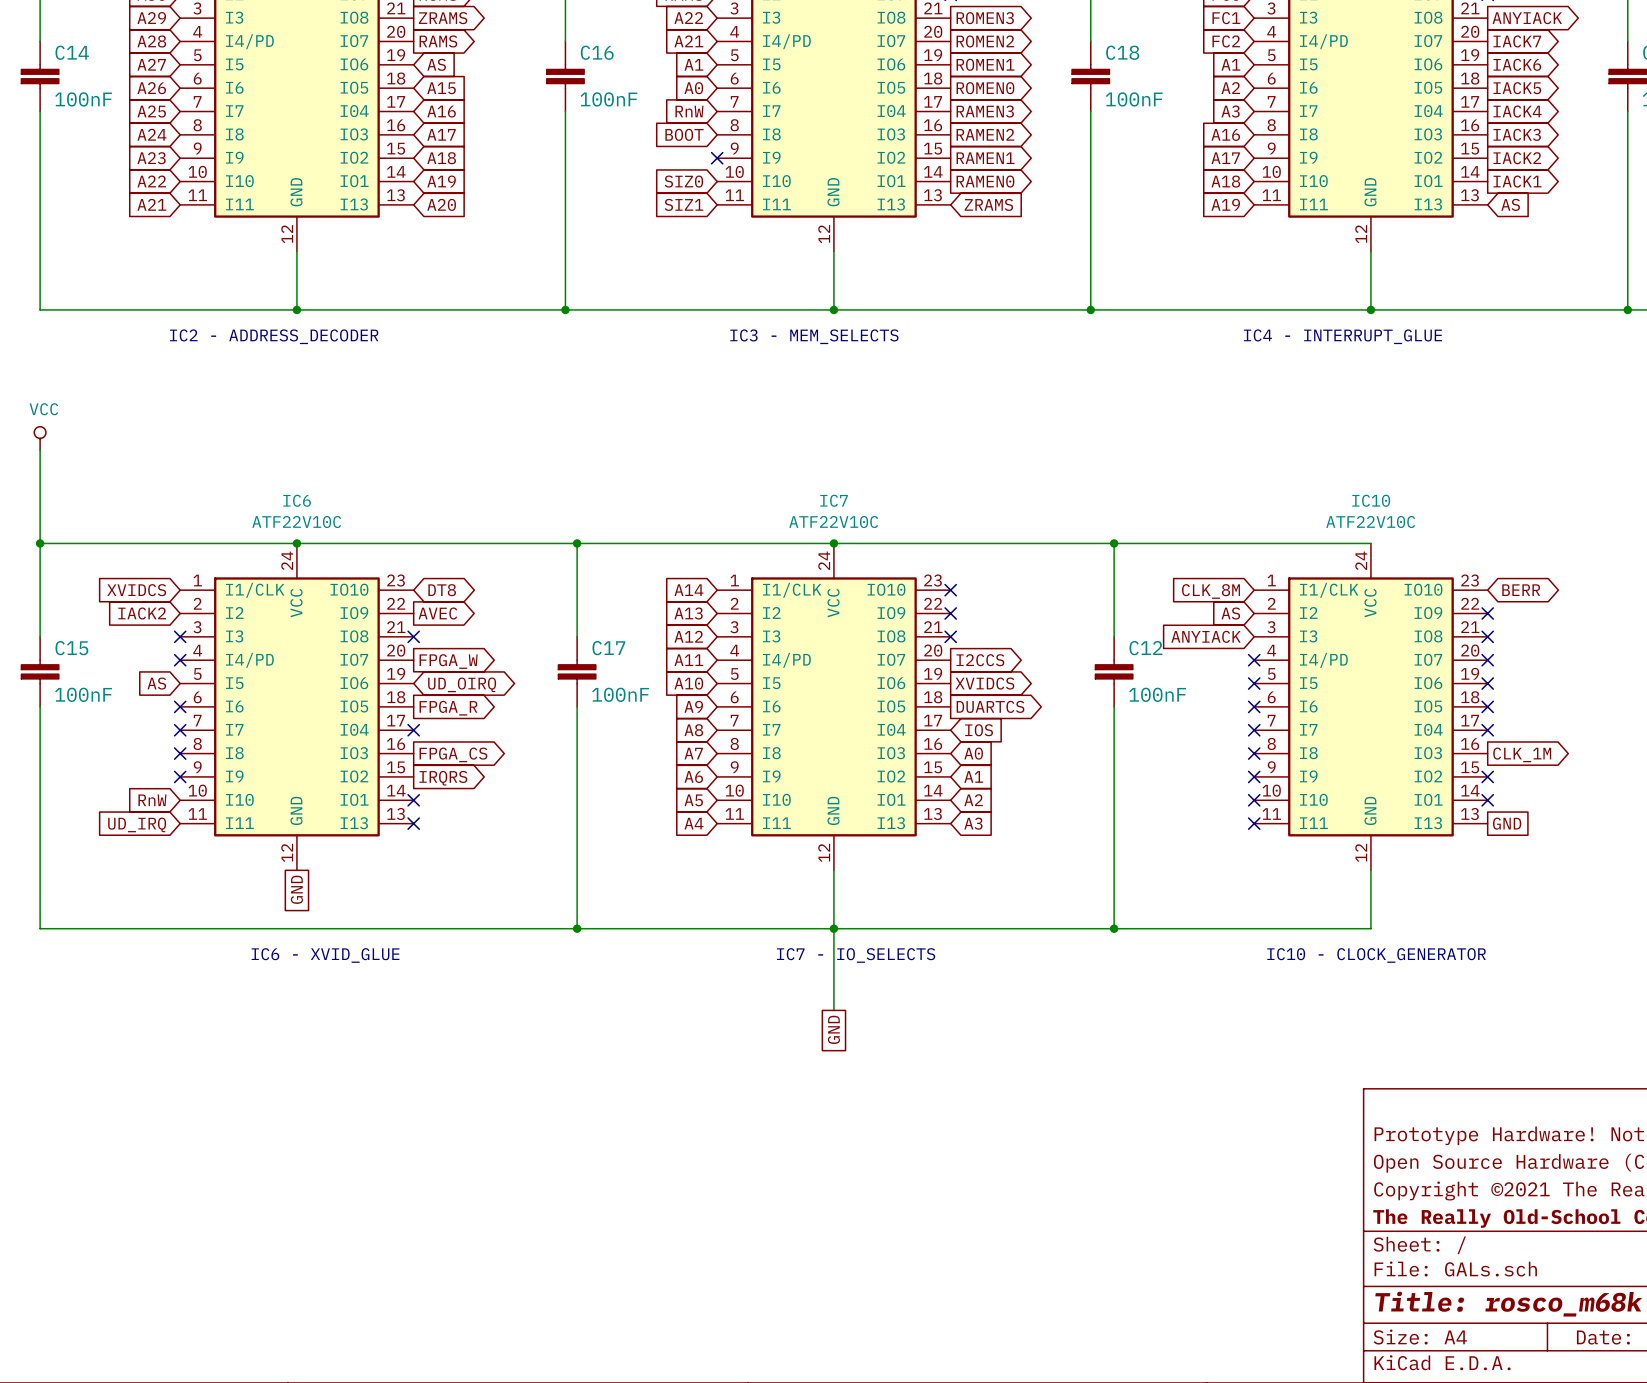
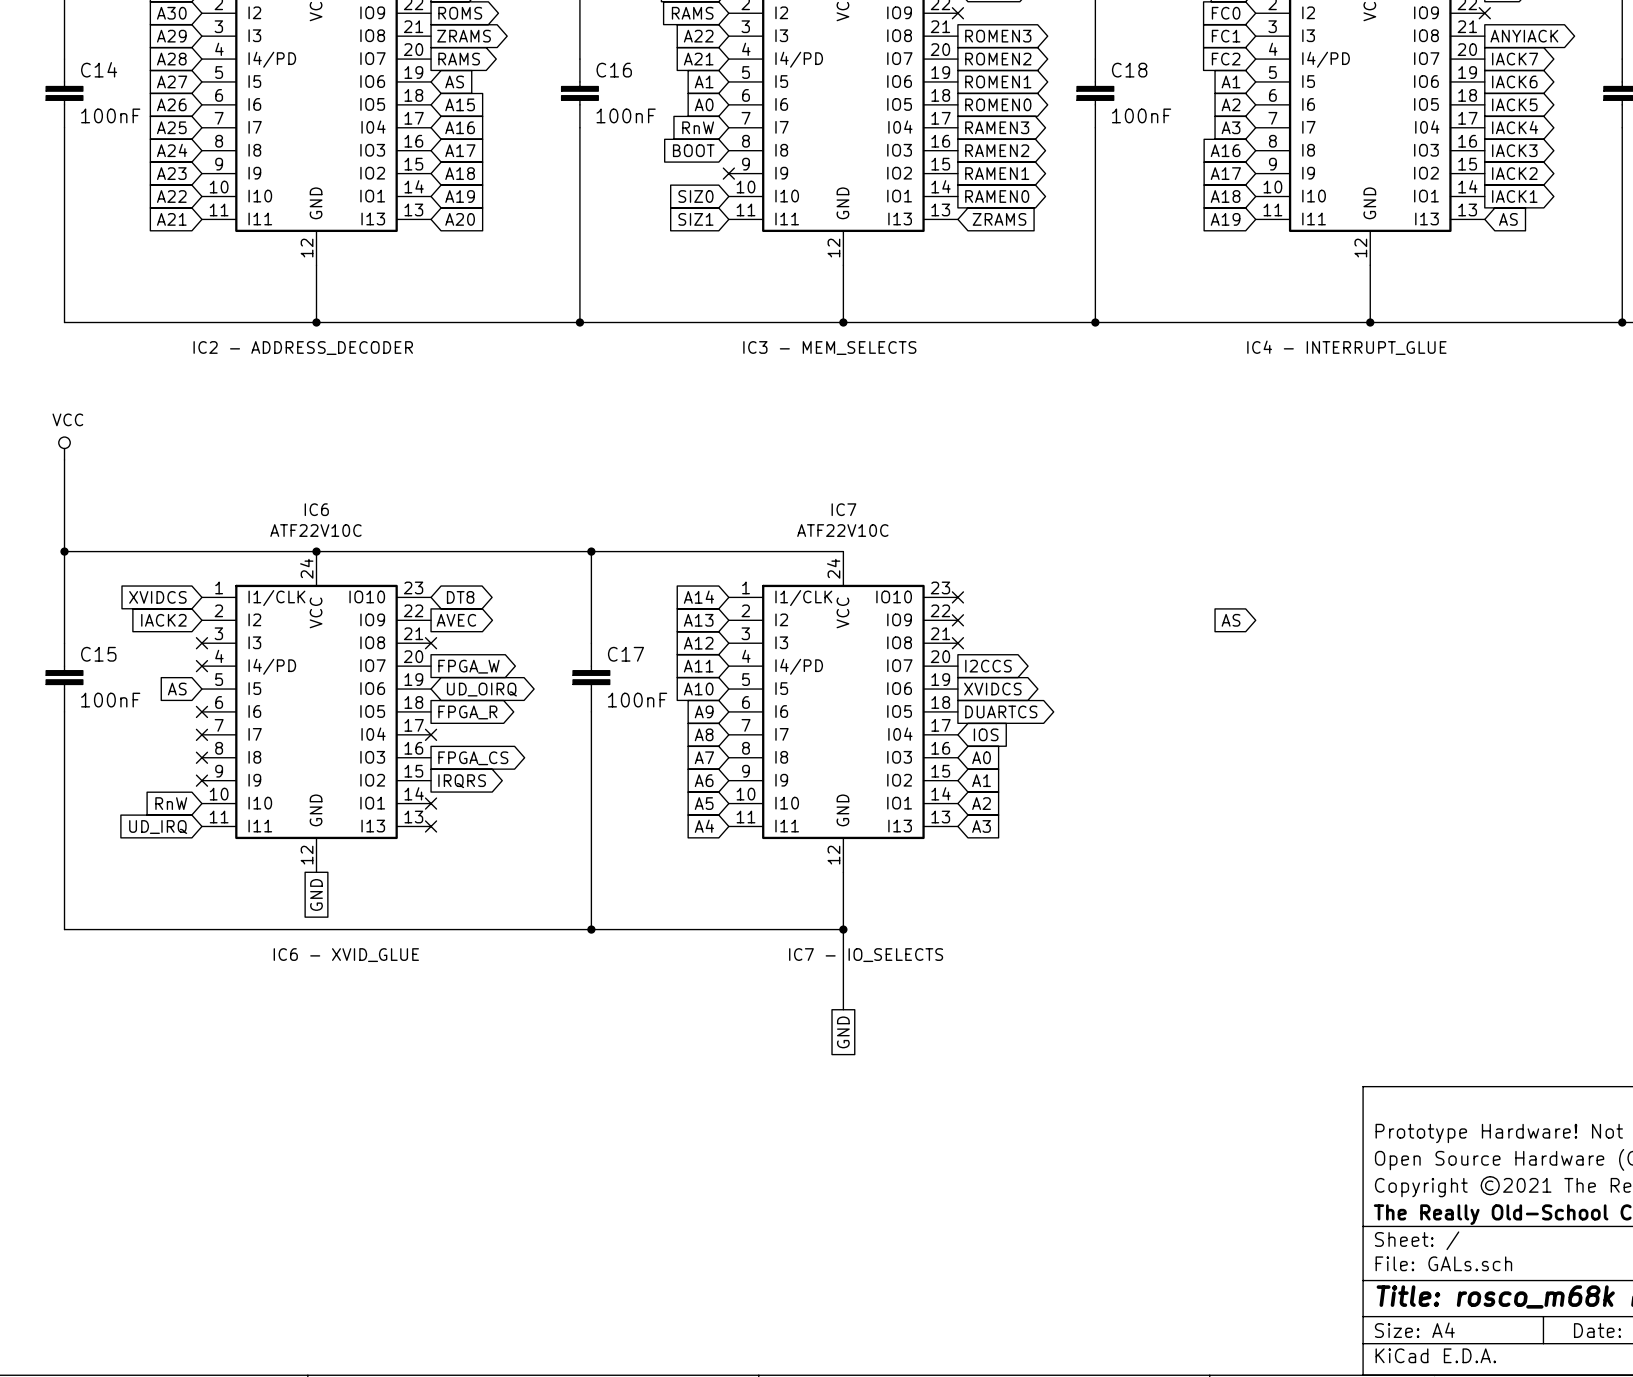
wire: (833, 543) (1370, 543) -> none
junction: (833, 543) -> none
wire: (1114, 543) (1114, 636) -> none
junction: (1114, 543) -> none
global label: BERR (1521, 590) -> none
global label: CLK_8M (1210, 591) -> none
no-connect mark: (1487, 613) -> none
global label: ANYIACK (1206, 636) -> none
no-connect mark: (1487, 636) -> none
no-connect mark: (1254, 660) -> none
no-connect mark: (1487, 660) -> none
C12: 100nF (1114, 671) -> none
no-connect mark: (1254, 683) -> none
no-connect mark: (1487, 683) -> none
wire: (1114, 706) (1114, 928) -> none
no-connect mark: (1254, 706) -> none
IC10: ATF22V10C (1370, 706) -> none
no-connect mark: (1487, 706) -> none
no-connect mark: (1254, 730) -> none
no-connect mark: (1487, 730) -> none
no-connect mark: (1254, 753) -> none
global label: CLK_1M (1522, 754) -> none
no-connect mark: (1254, 776) -> none
no-connect mark: (1487, 776) -> none
no-connect mark: (1254, 800) -> none
no-connect mark: (1487, 800) -> none
no-connect mark: (1254, 823) -> none
global label: GND (1507, 823) -> none
wire: (1370, 870) (1370, 928) (833, 928) -> none
junction: (1114, 928) -> none
text: IC10 - CLOCK_GENERATOR (1376, 955) -> none

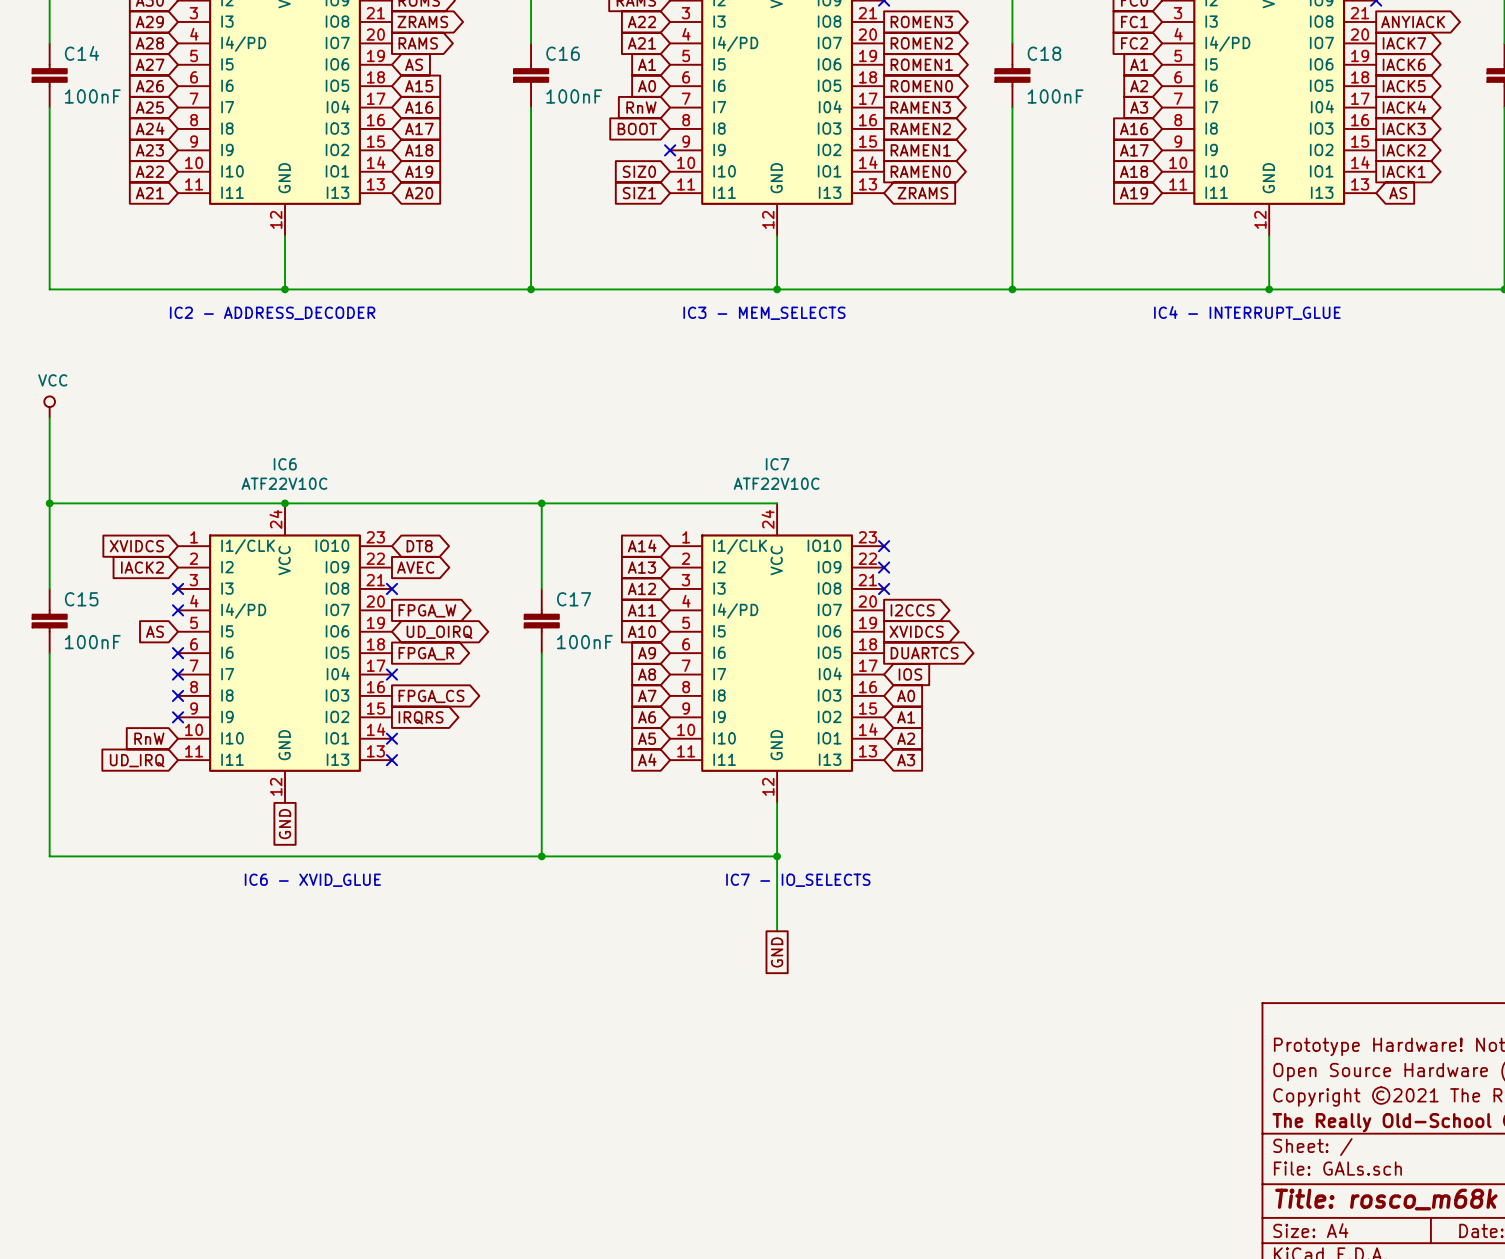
global label: AS (1231, 620) -> none

